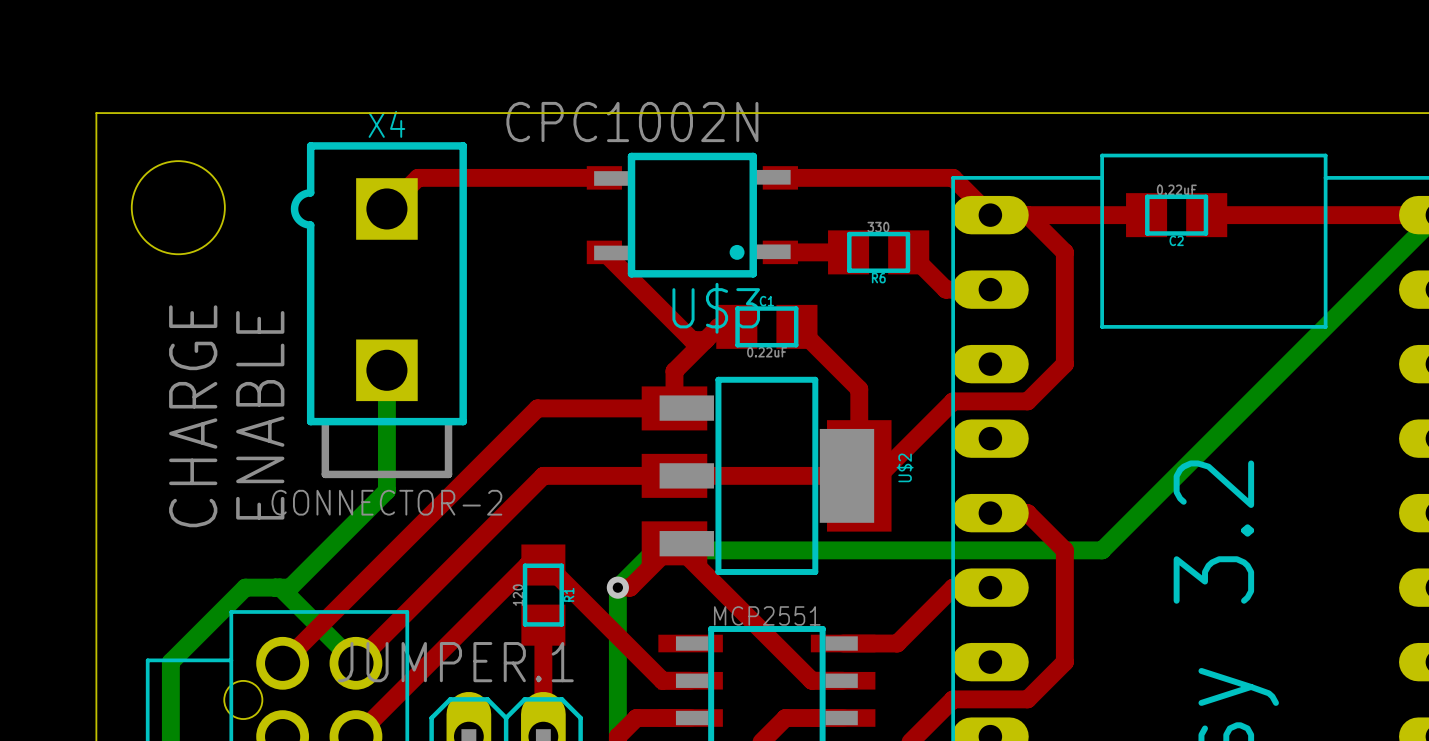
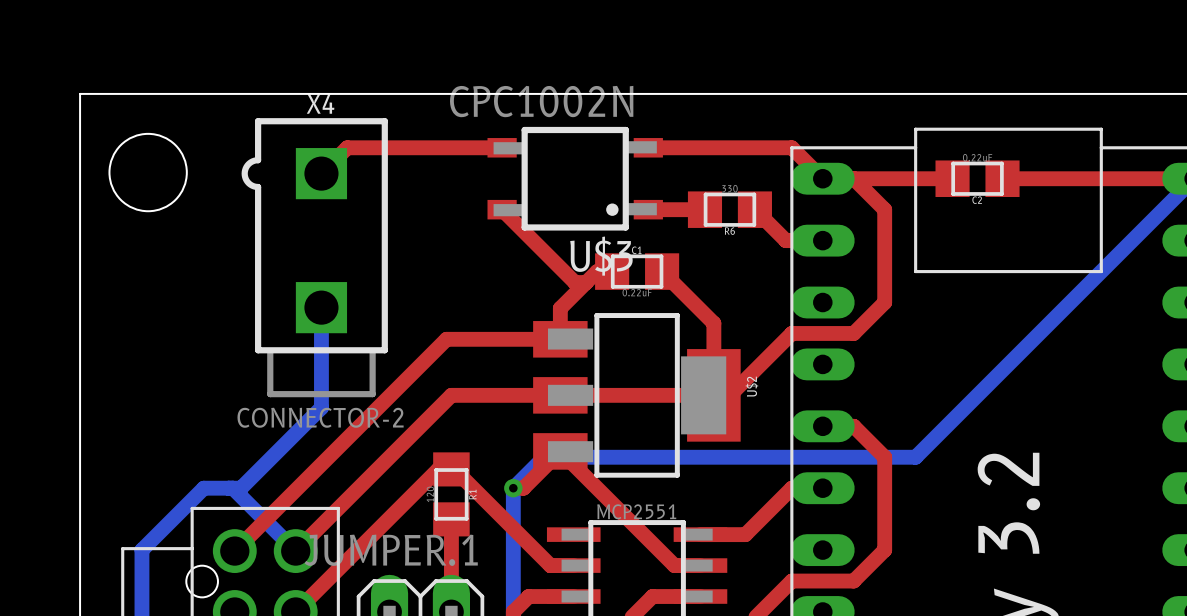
text: ENABLE (260, 415) -> none
text: CHARGE (193, 416) -> none

